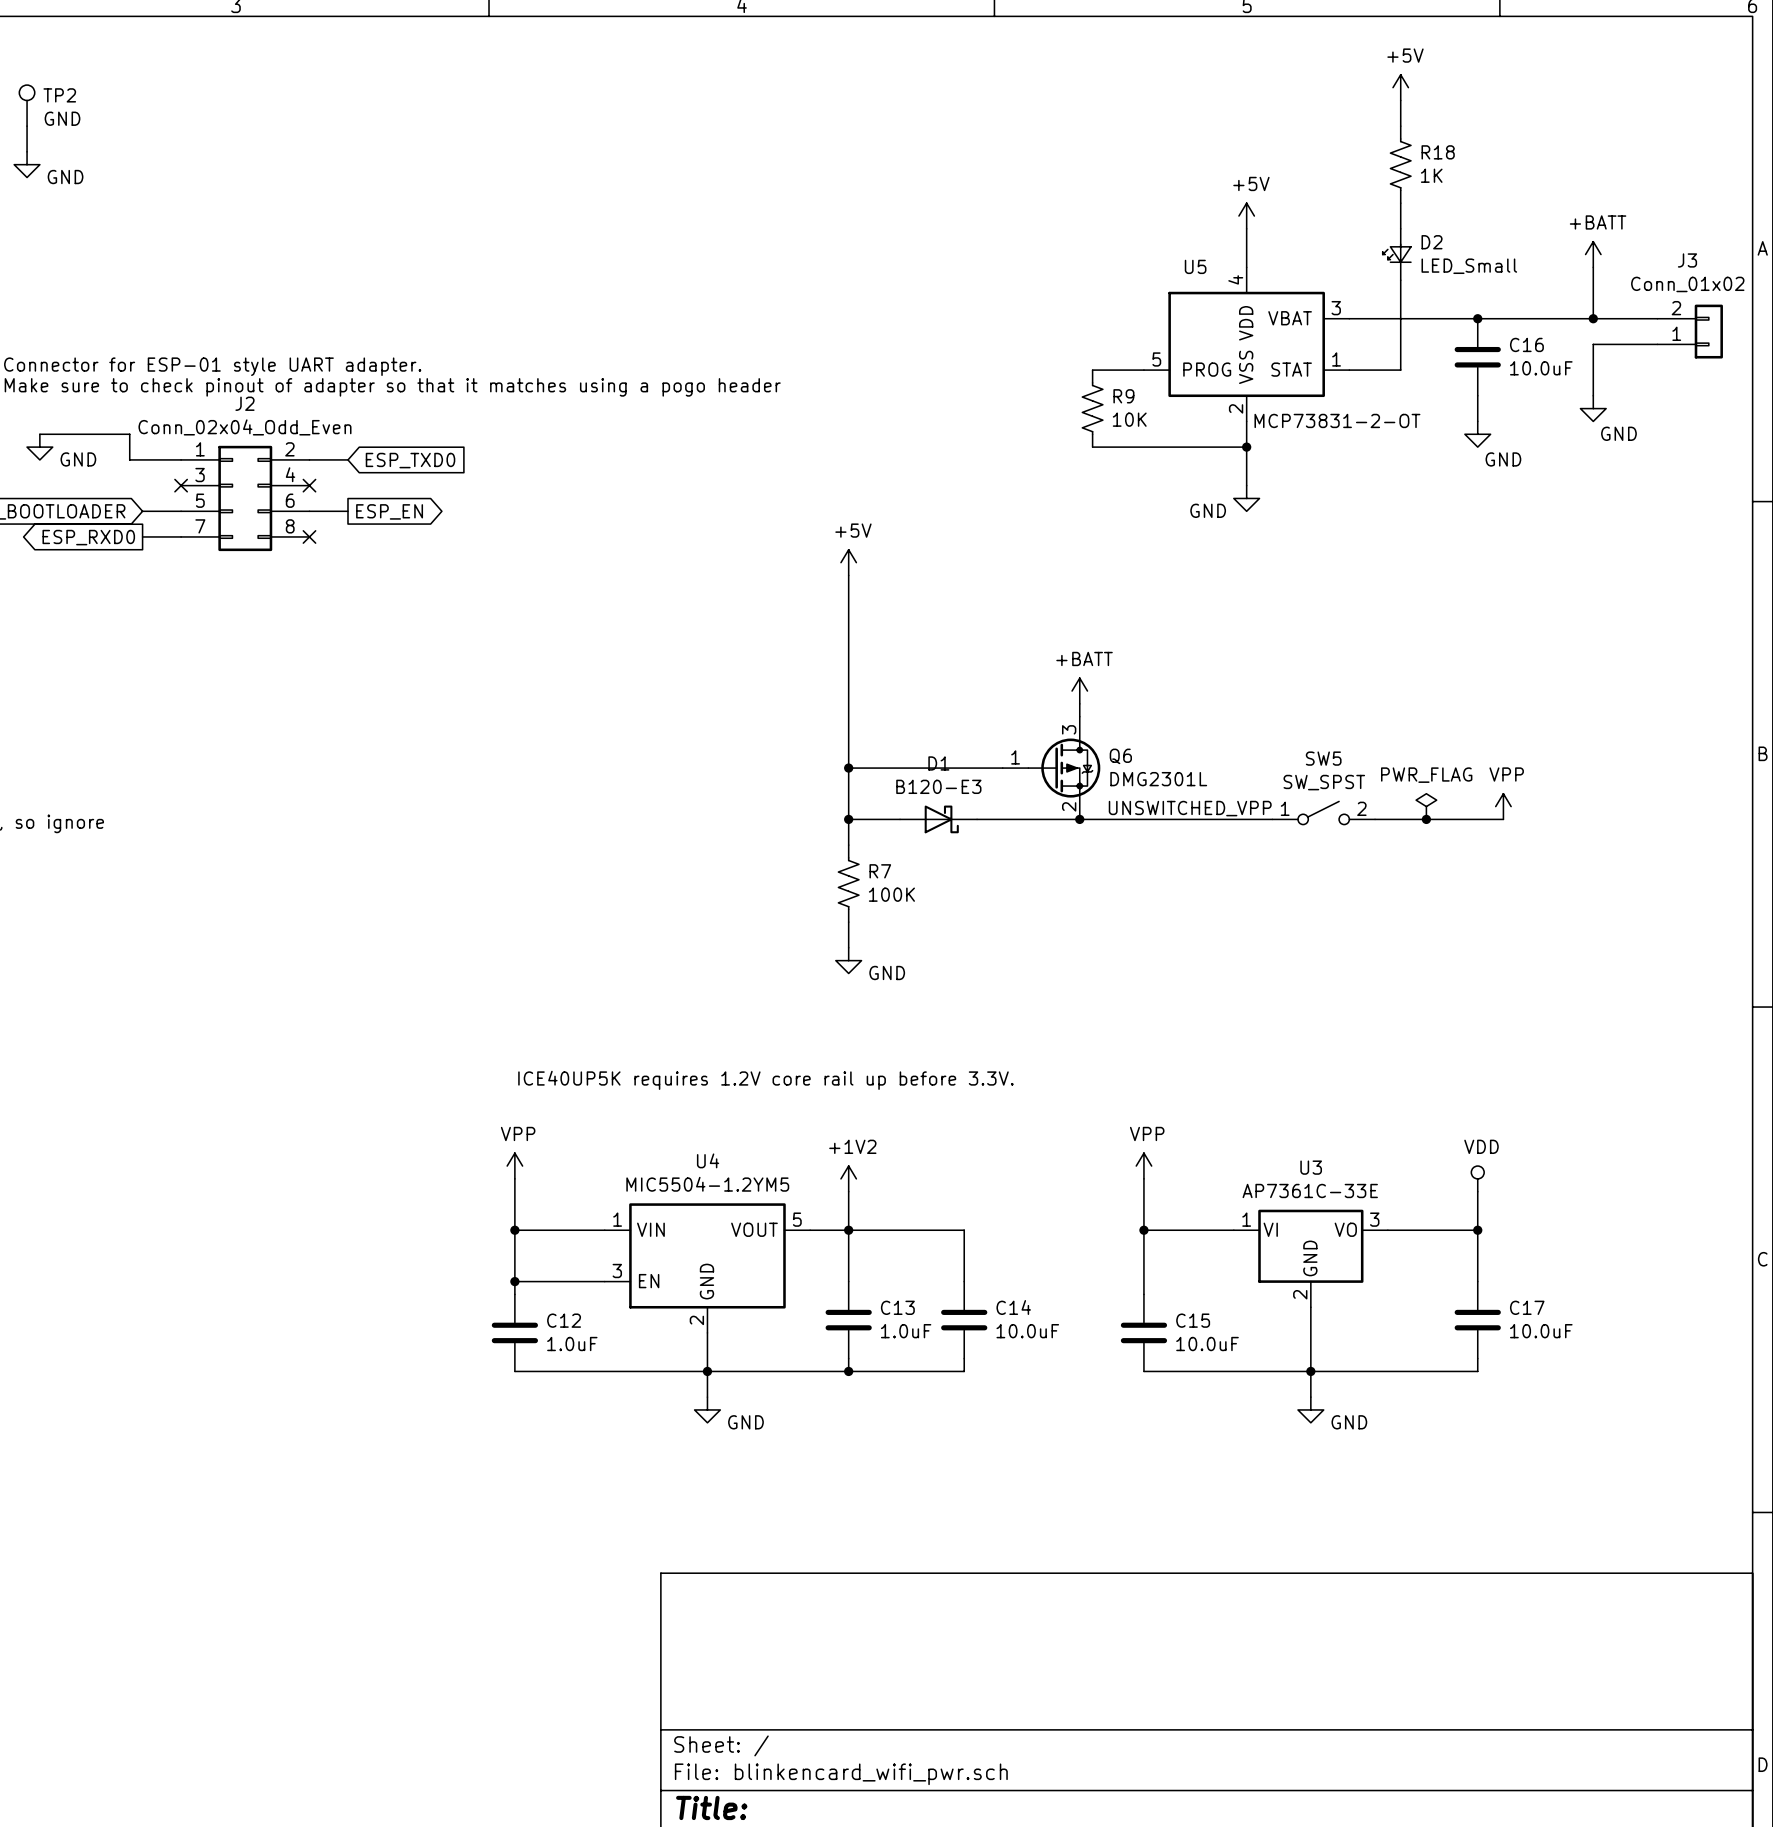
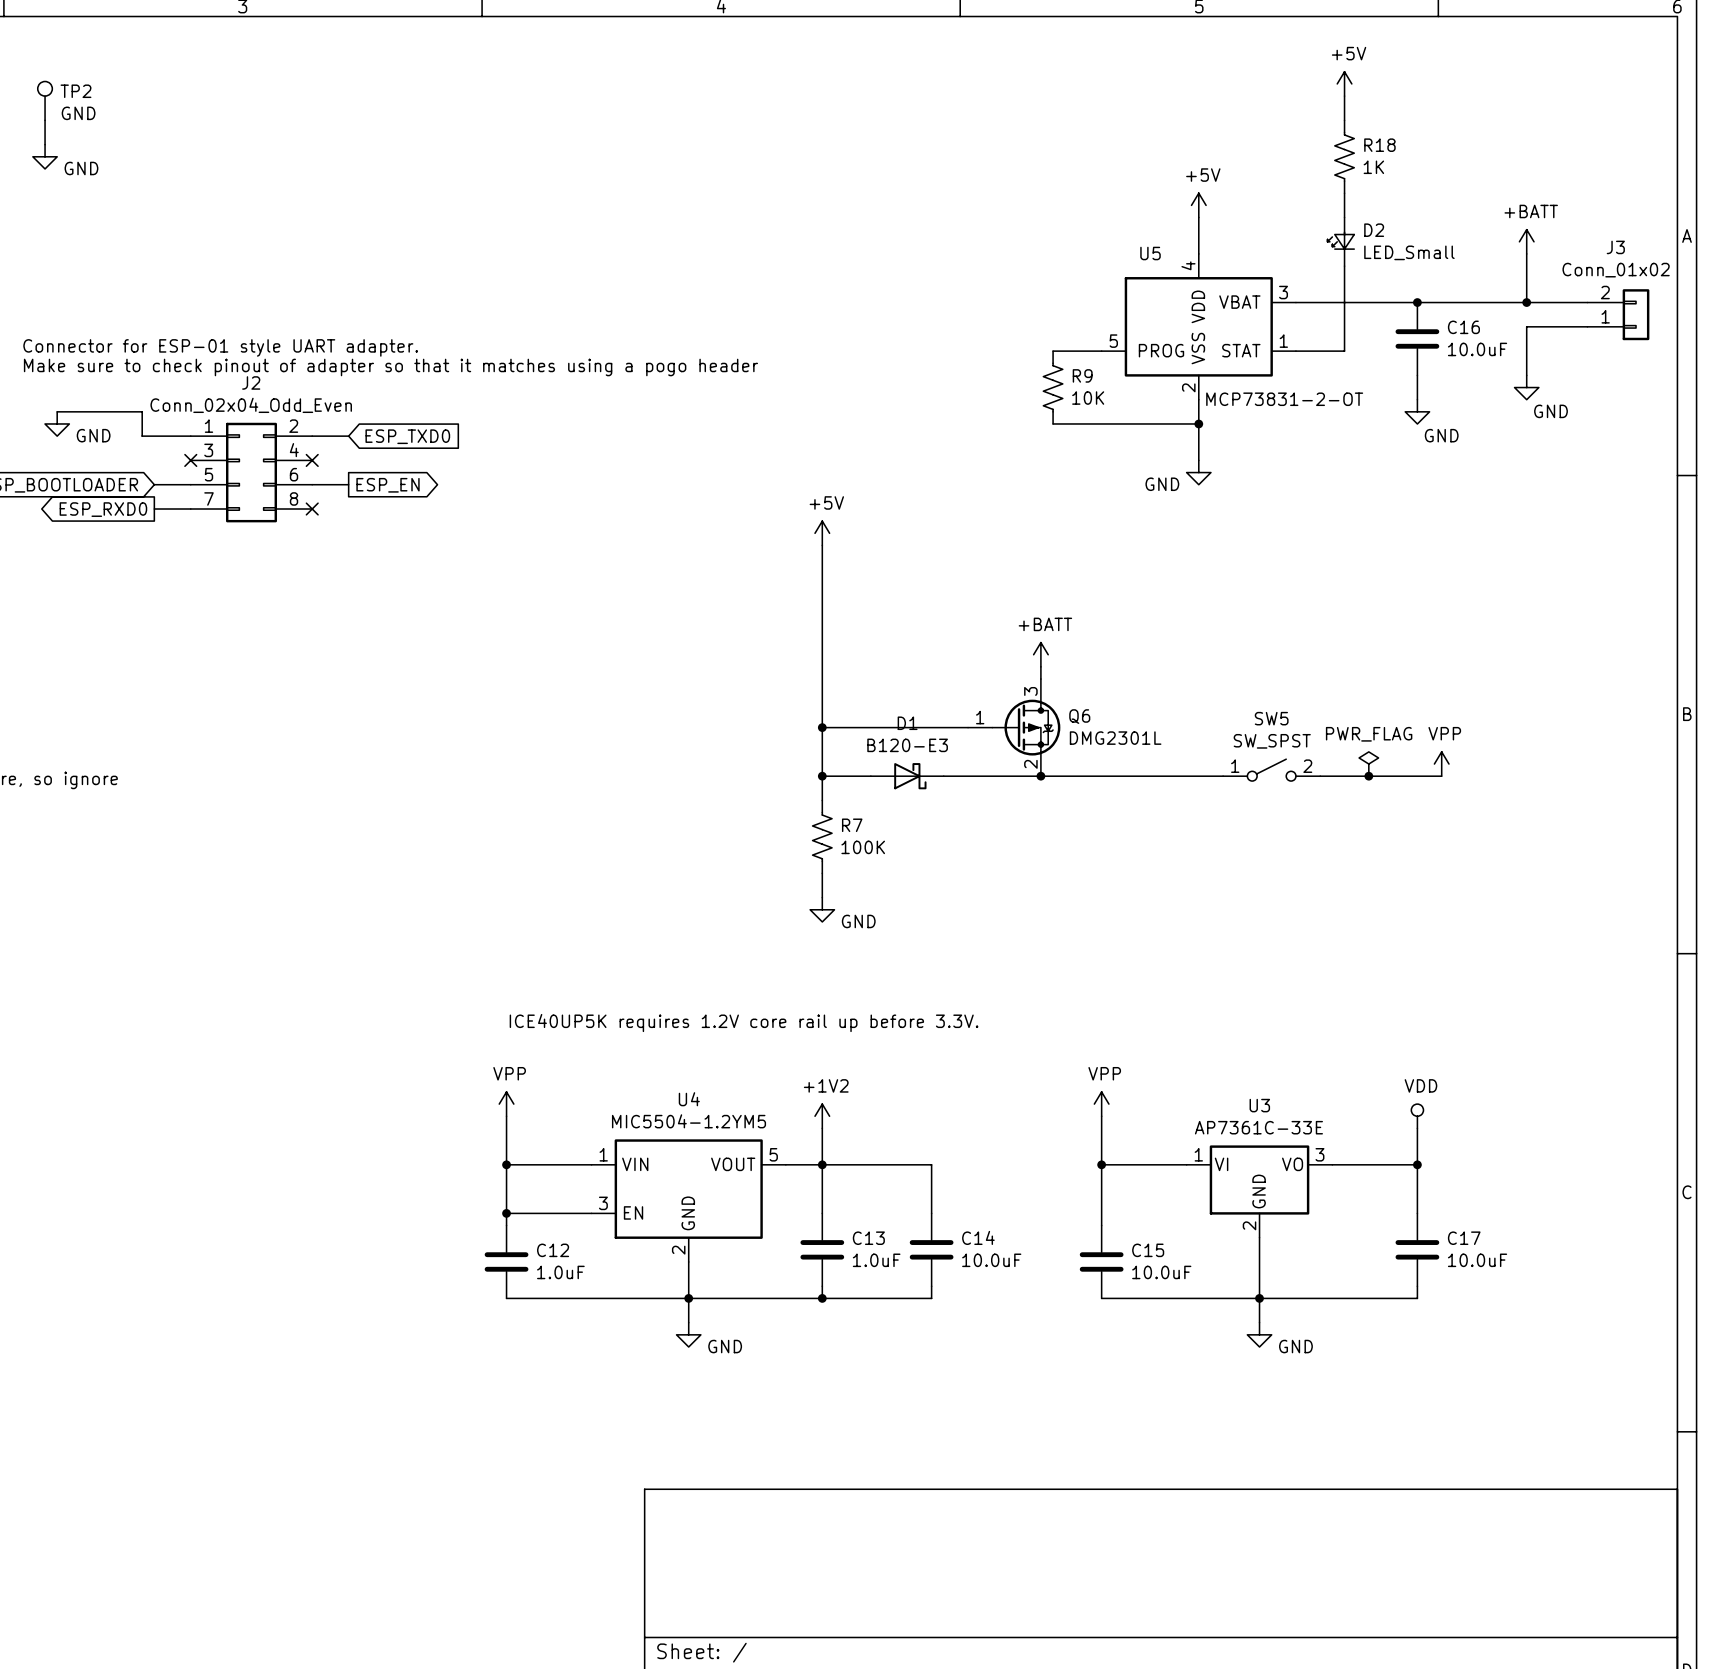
label: UNSWITCHED_VPP (1190, 808) -> none

